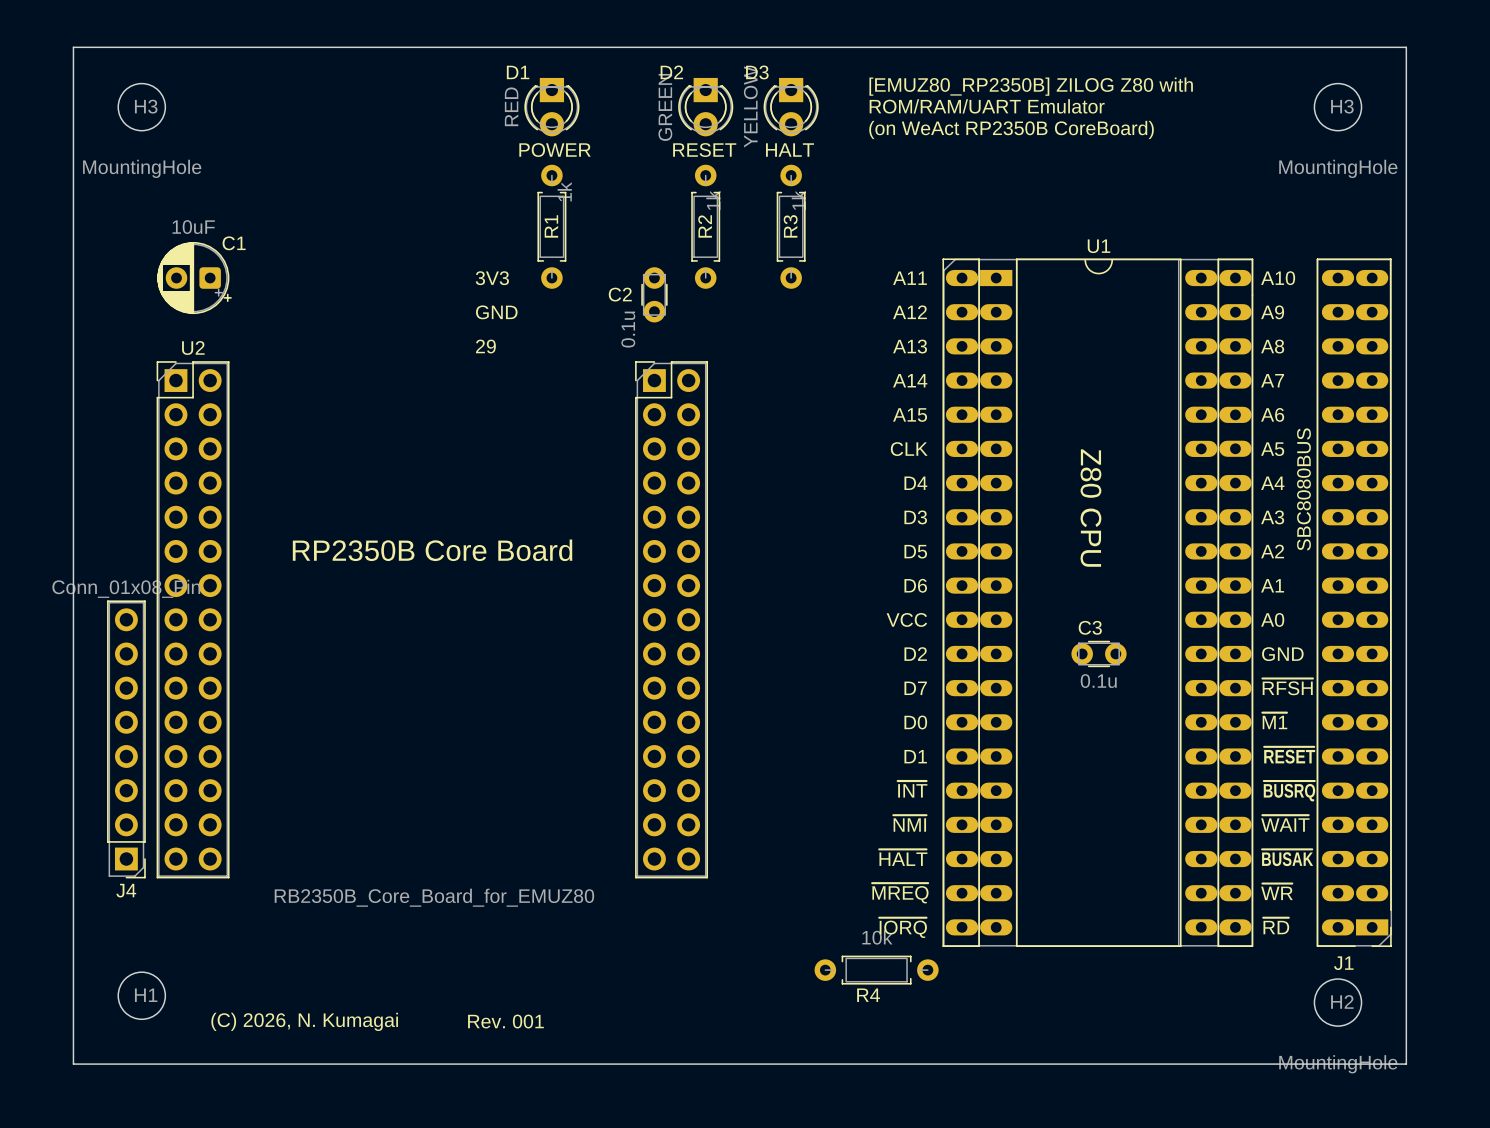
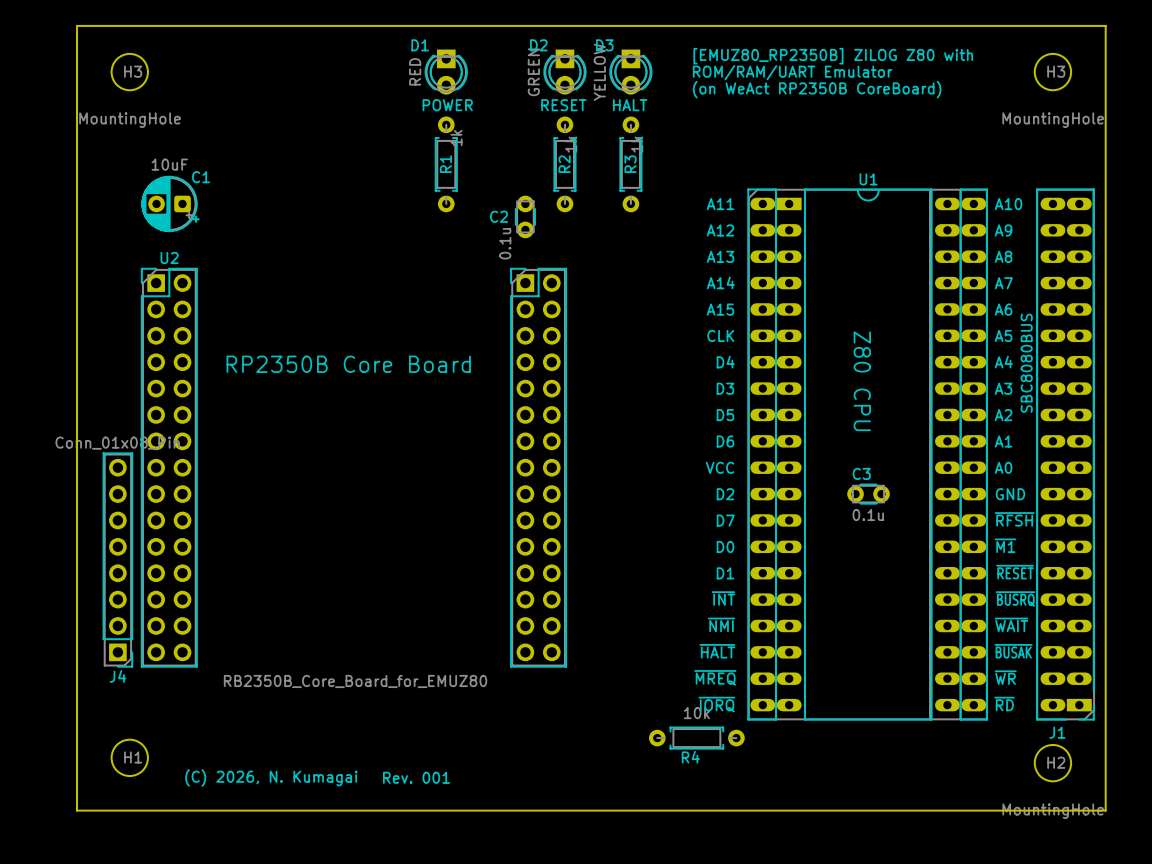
text: 3V3 (492, 278) -> none
text: GND (496, 312) -> none
text: 29 (485, 346) -> none
text position: RP2350B Core Board (432, 550) -> RP2350B Core Board (348, 364)

